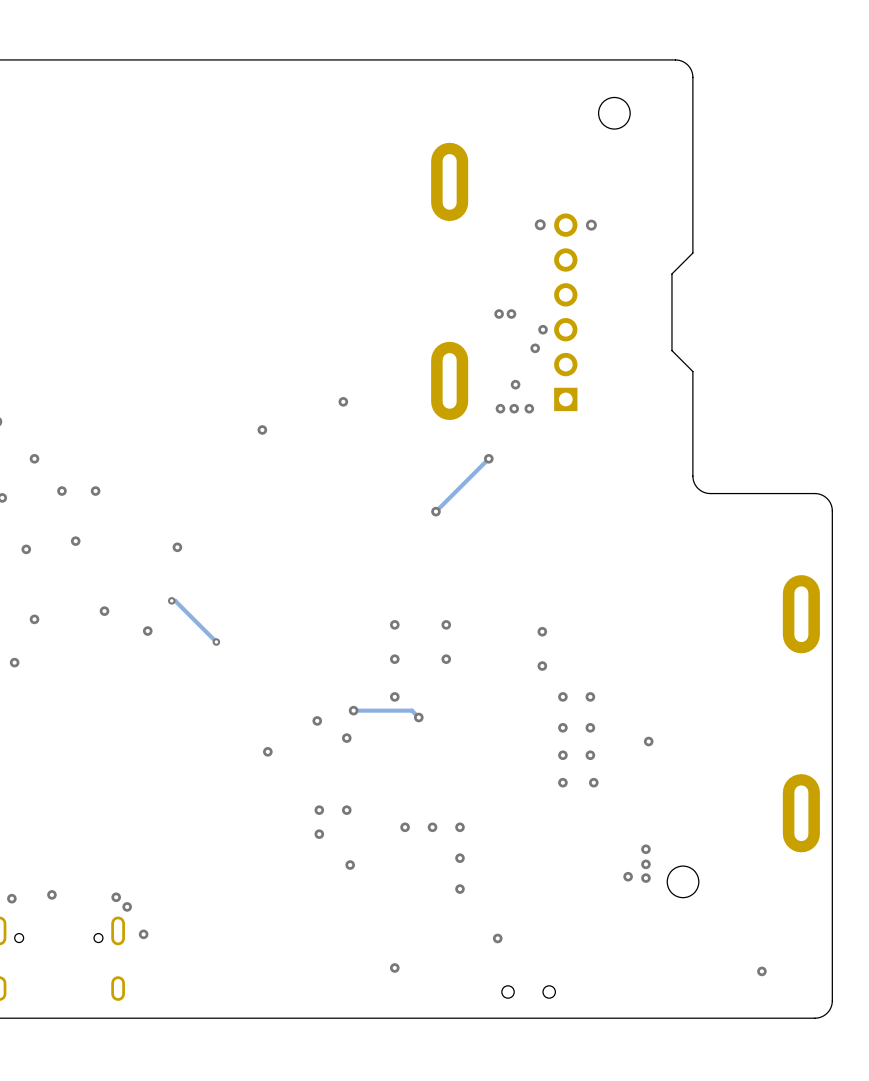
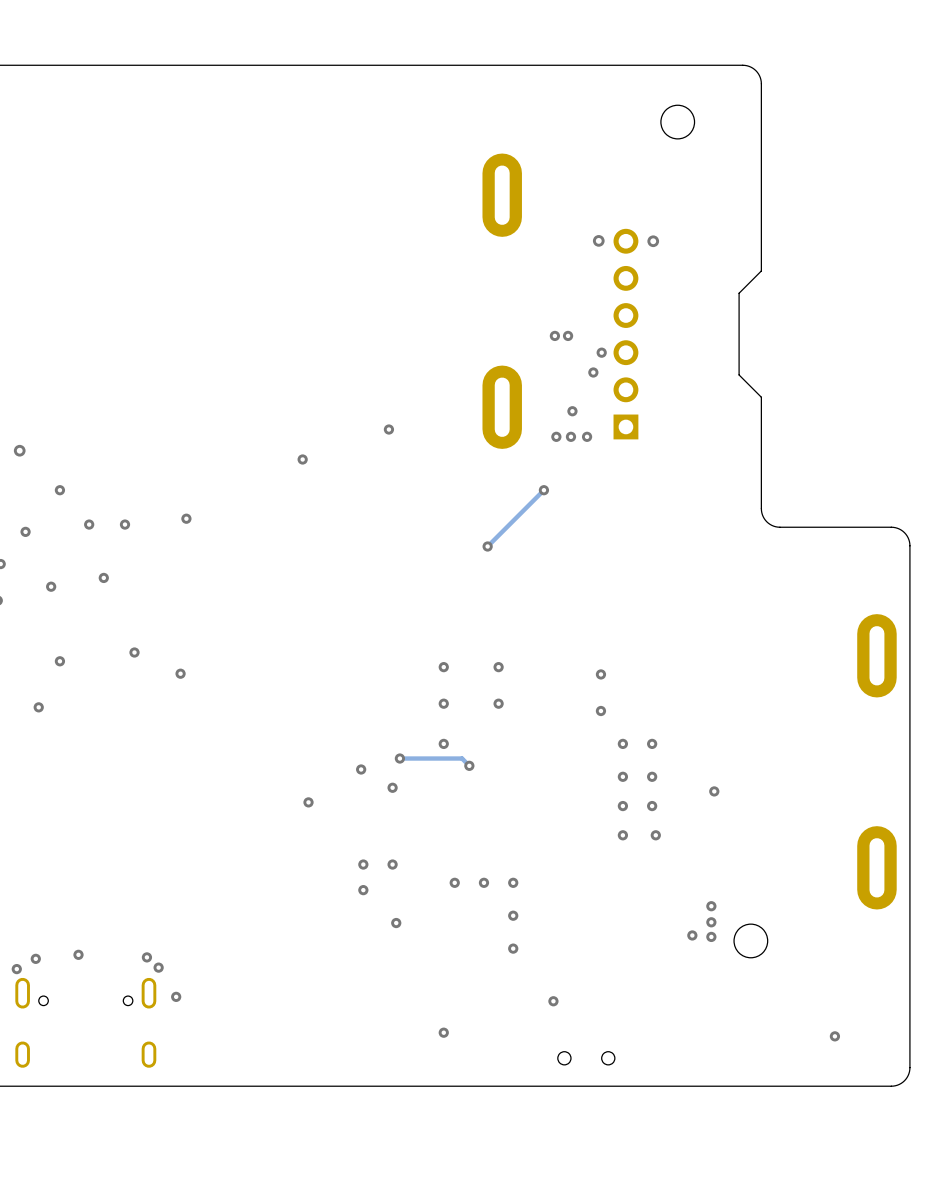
via position: (177, 547) -> (186, 518)
track: (171, 600) (175, 600) (216, 642) -> none
via: (171, 600) -> none
via: (216, 642) -> none

